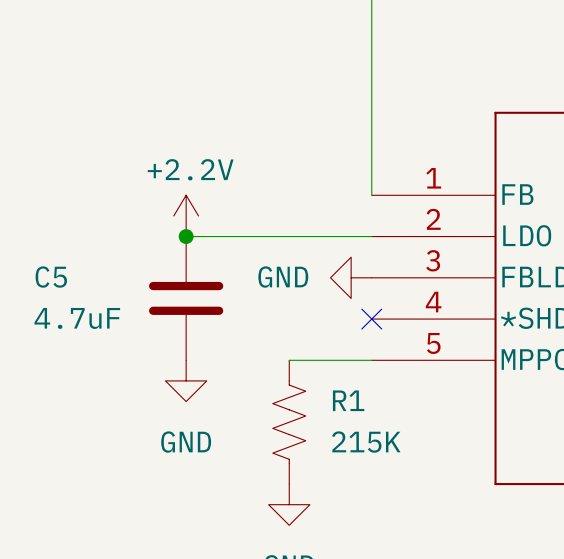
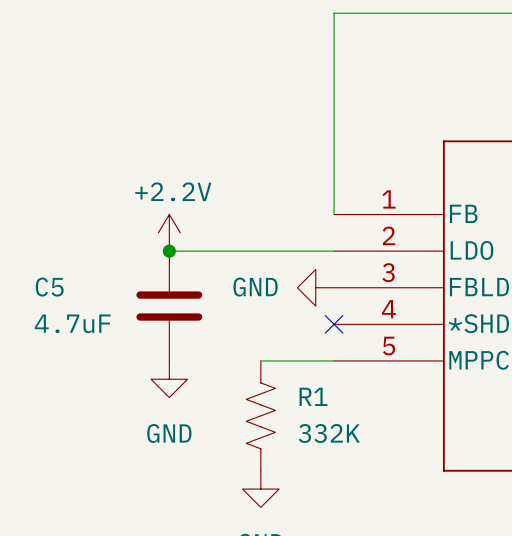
R1 value: 215K (366, 442) -> 332K (329, 433)

